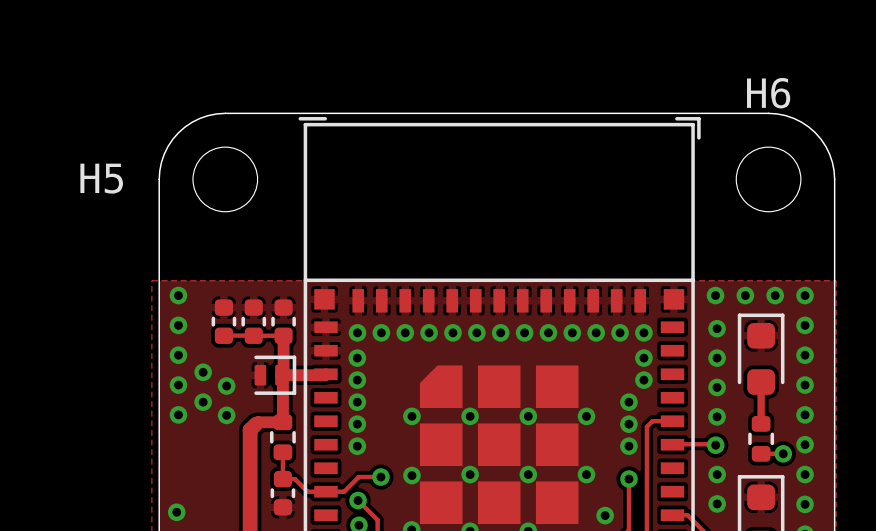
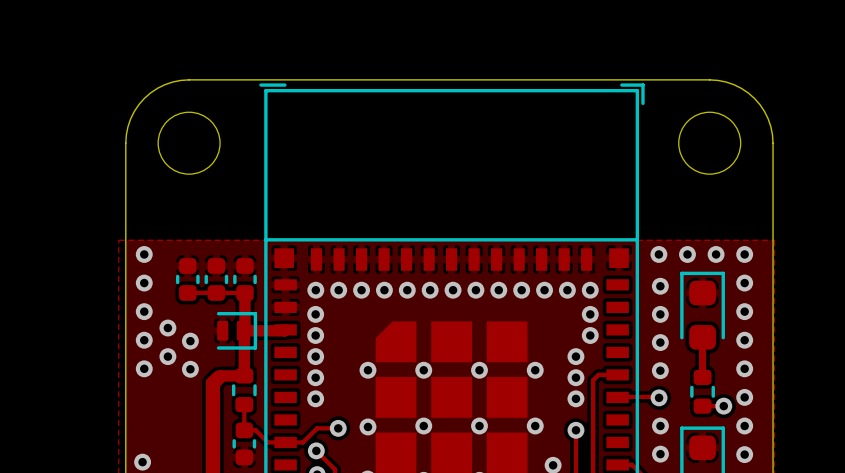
H6 name: H6 (768, 93) -> none
H5 name: H5 (101, 178) -> none

